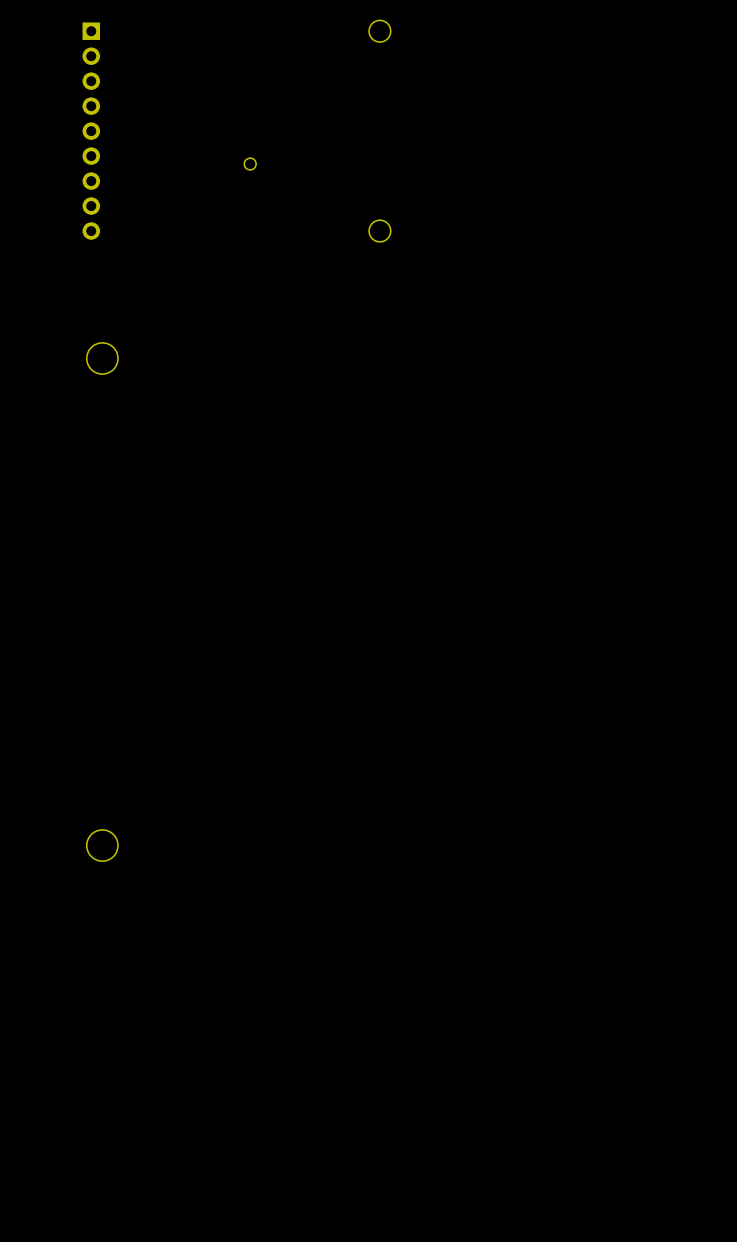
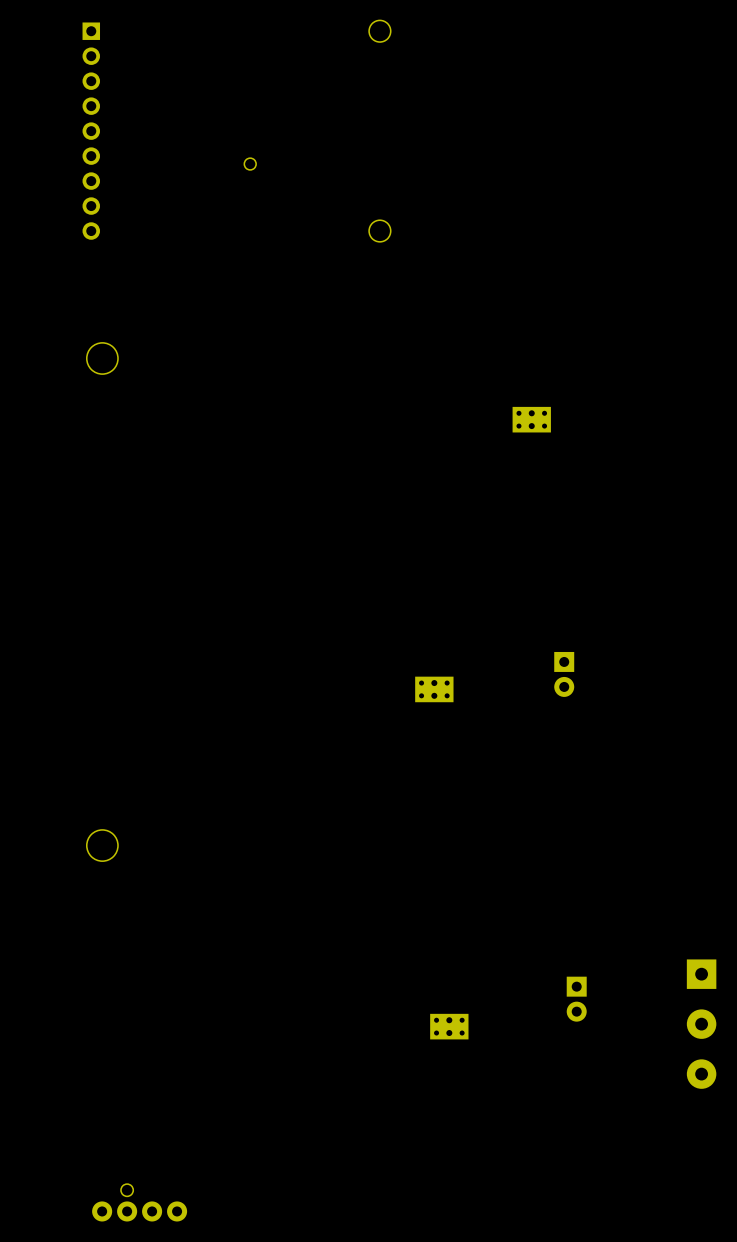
part: none -> (531, 419)
part: none -> (564, 674)
part: none -> (434, 689)
part: none -> (576, 999)
part: none -> (701, 1024)
part: none -> (449, 1026)
part: none -> (139, 1202)

